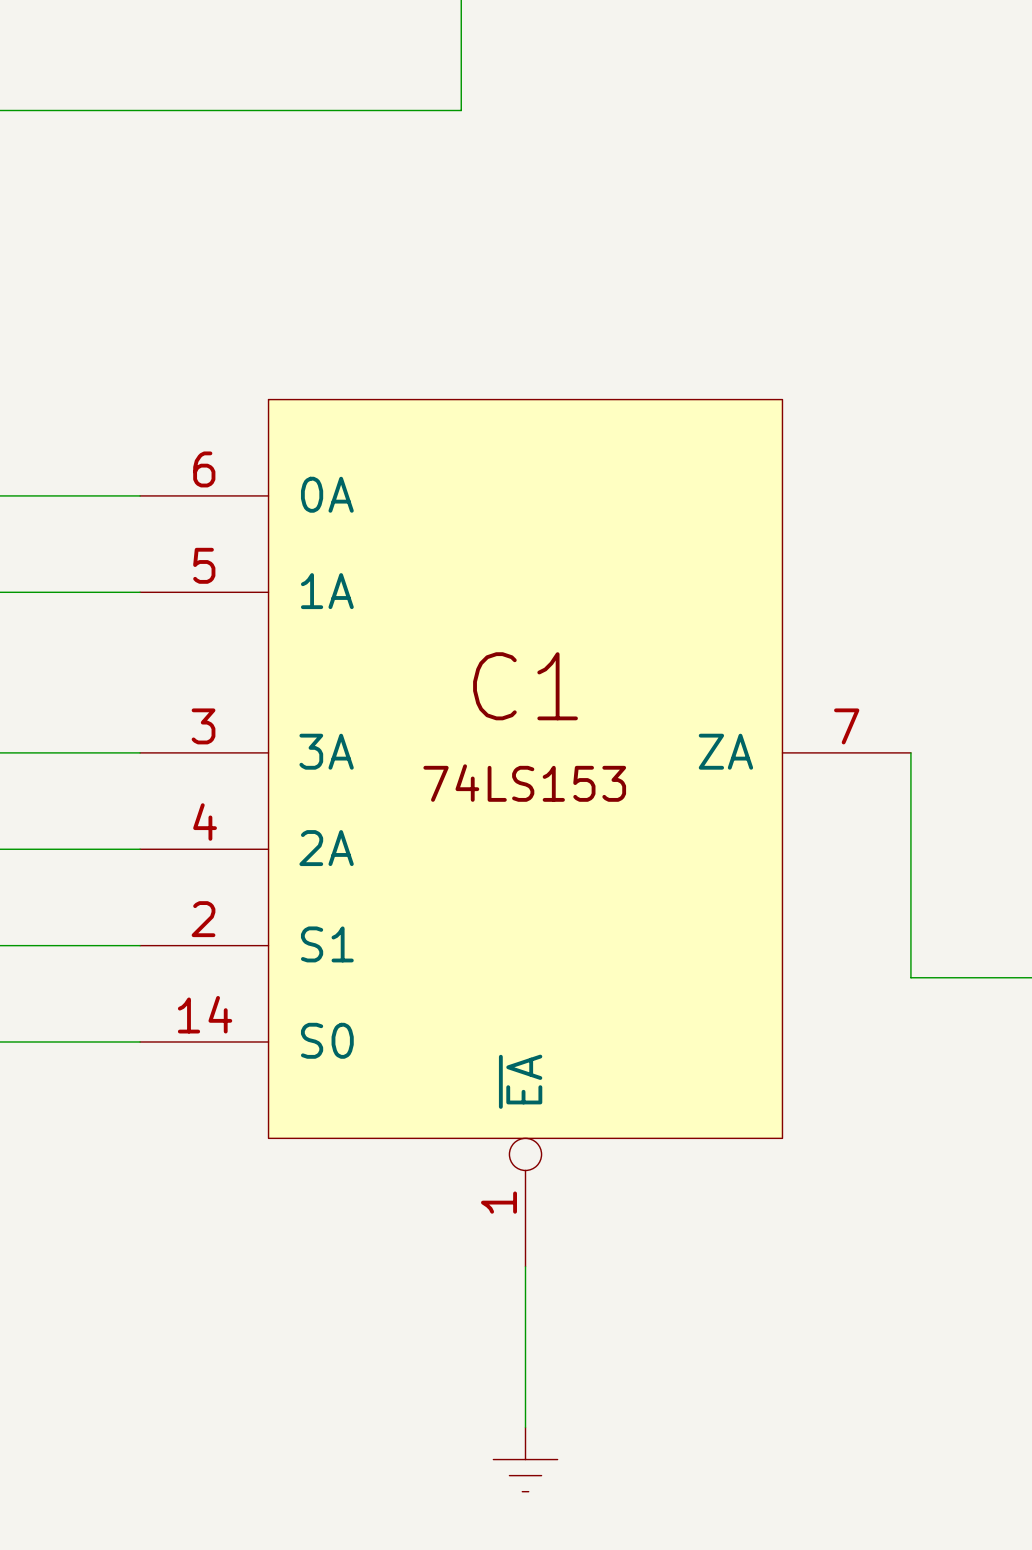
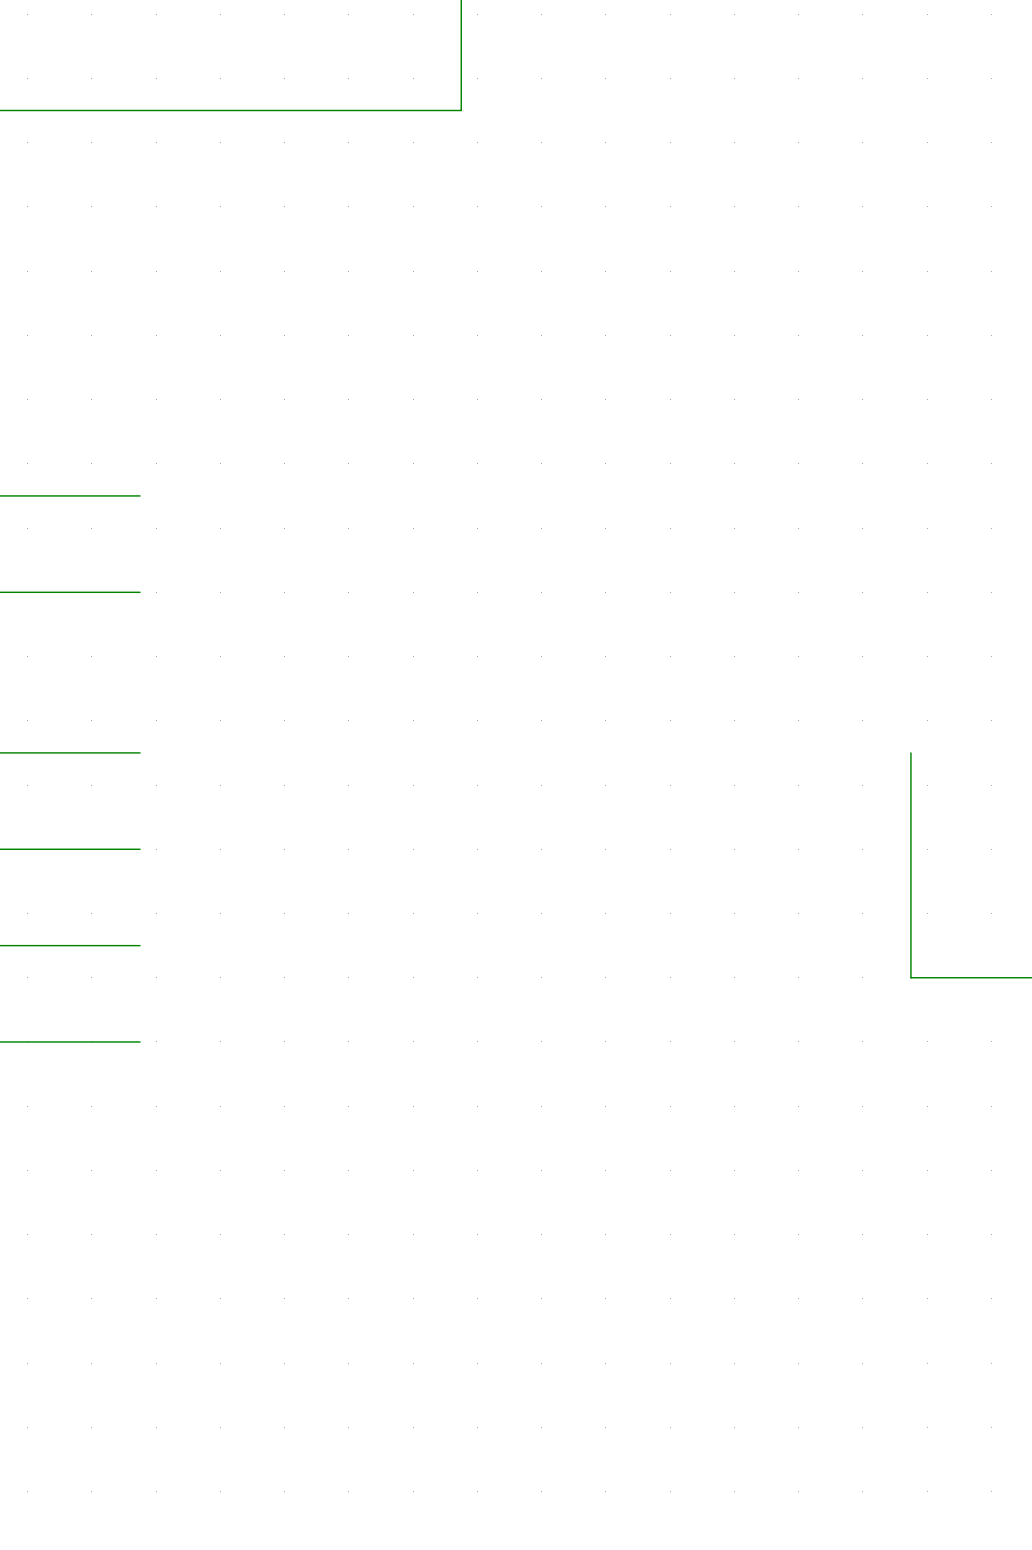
part: (525, 833) -> none
wire: (525, 1266) (525, 1427) -> none
power symbol: (525, 1459) -> none

